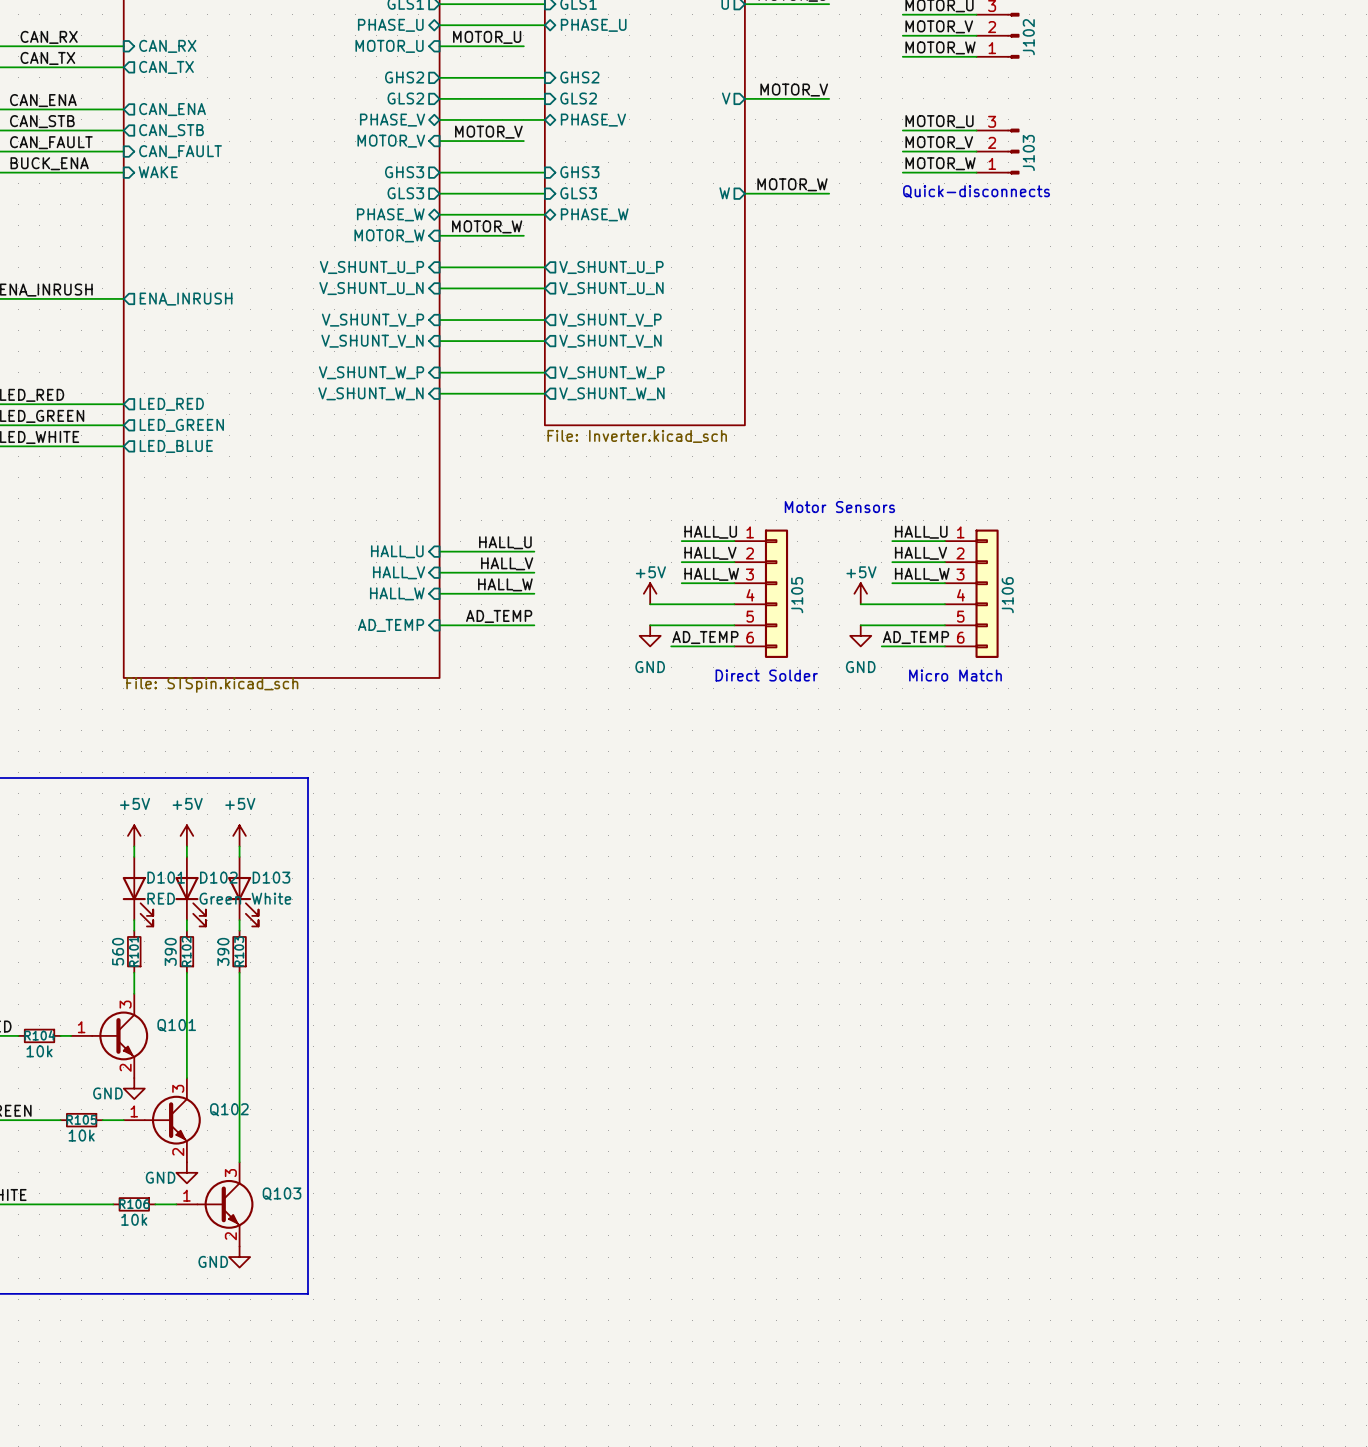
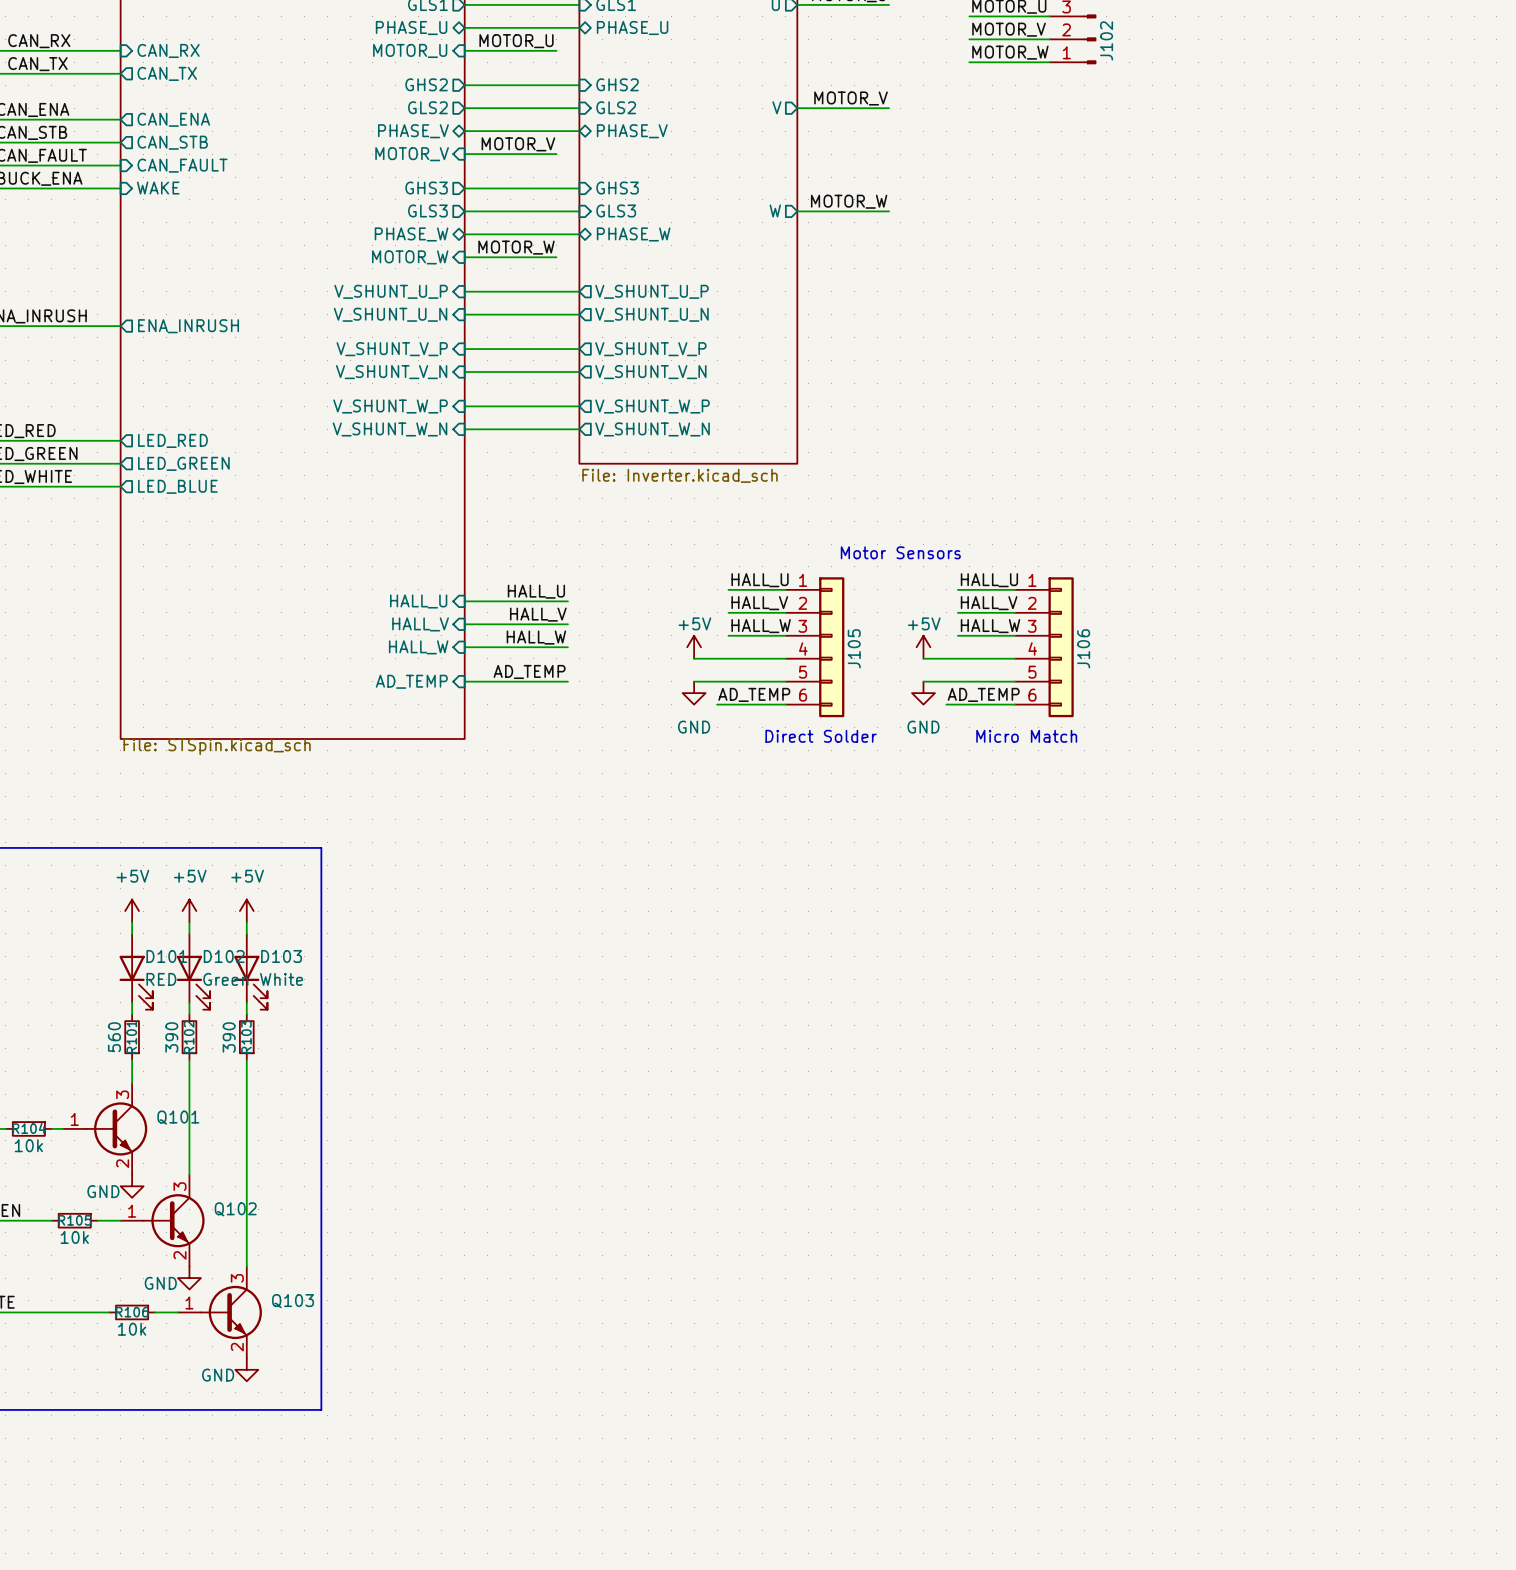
label: MOTOR_U (939, 121) -> none
wire: (902, 130) (976, 130) -> none
label: MOTOR_V (939, 142) -> none
wire: (902, 151) (976, 151) -> none
J103: (997, 151) -> none
label: MOTOR_W (940, 163) -> none
wire: (902, 172) (976, 172) -> none
text: Quick-disconnects (976, 191) -> none

